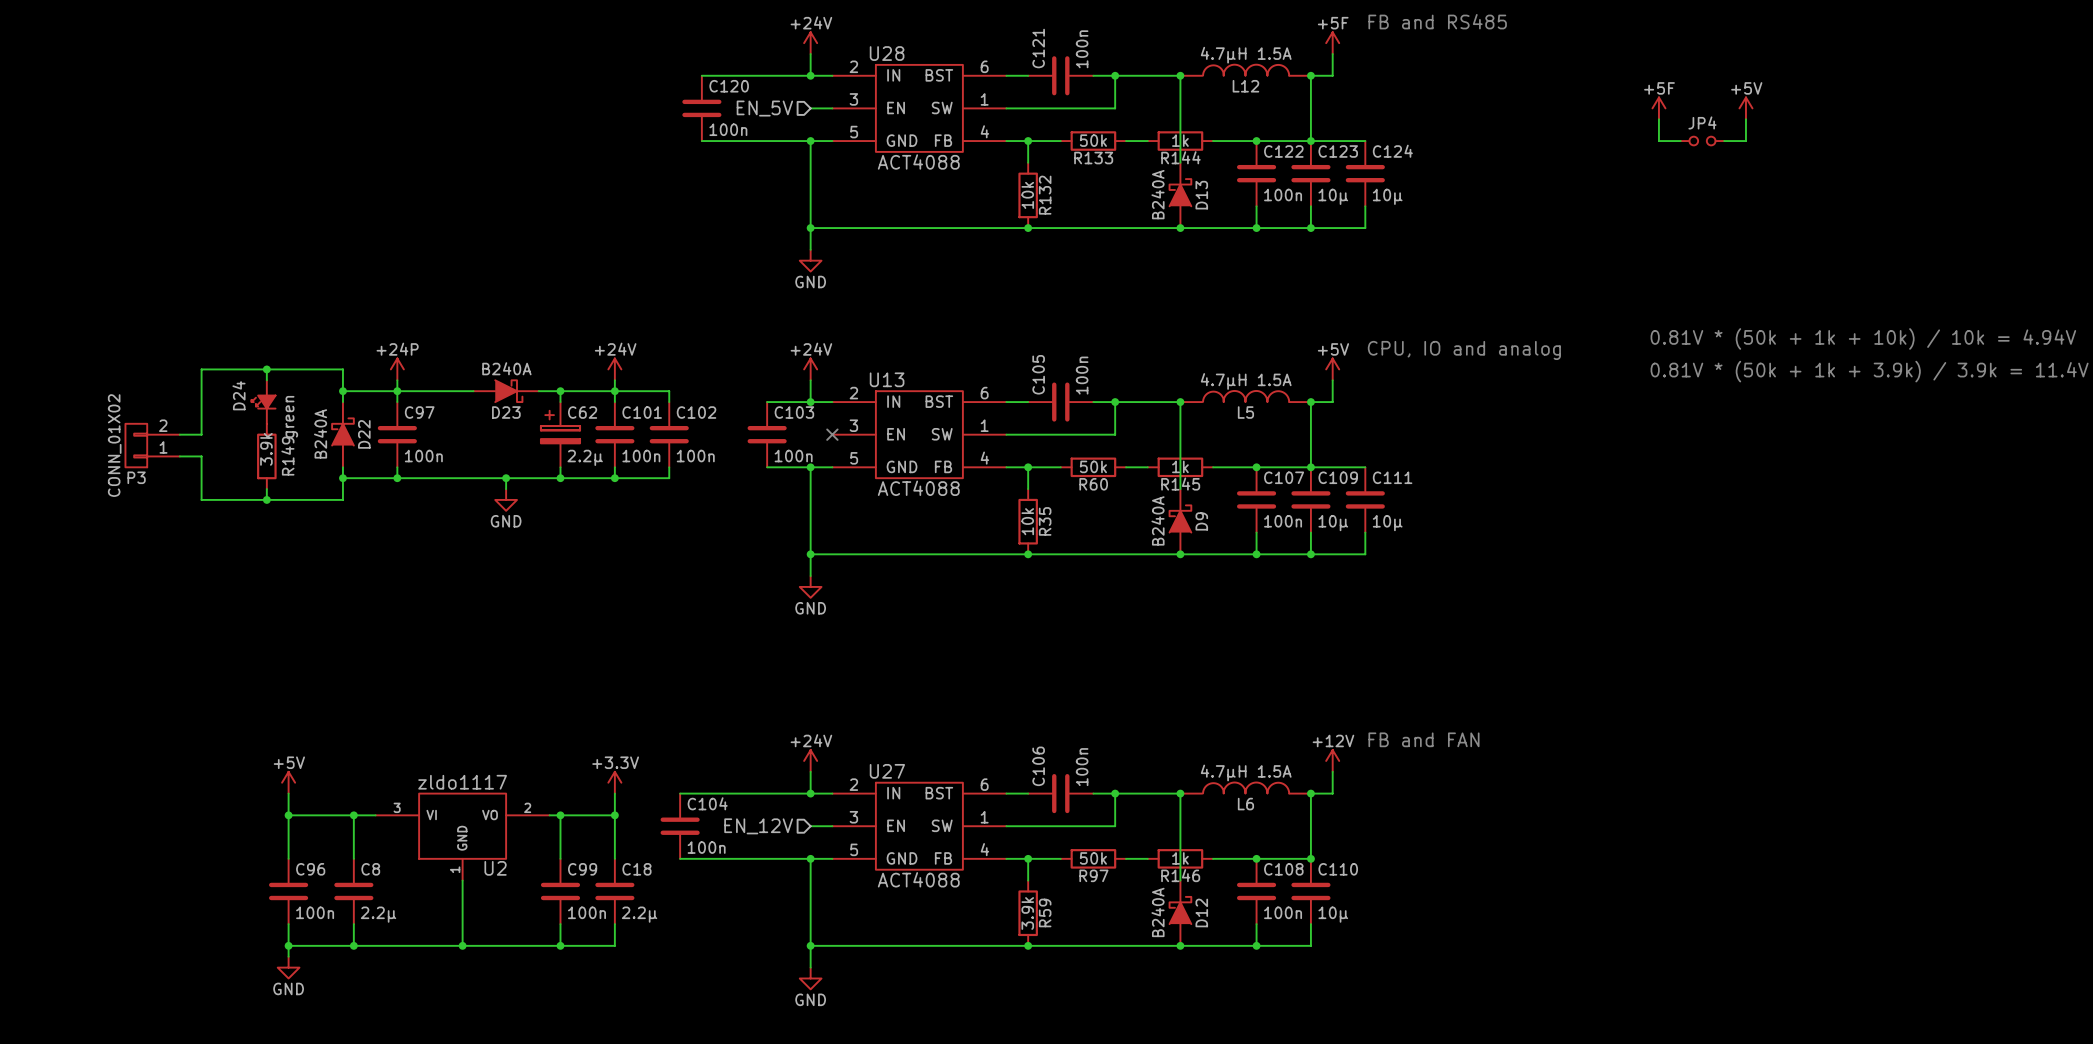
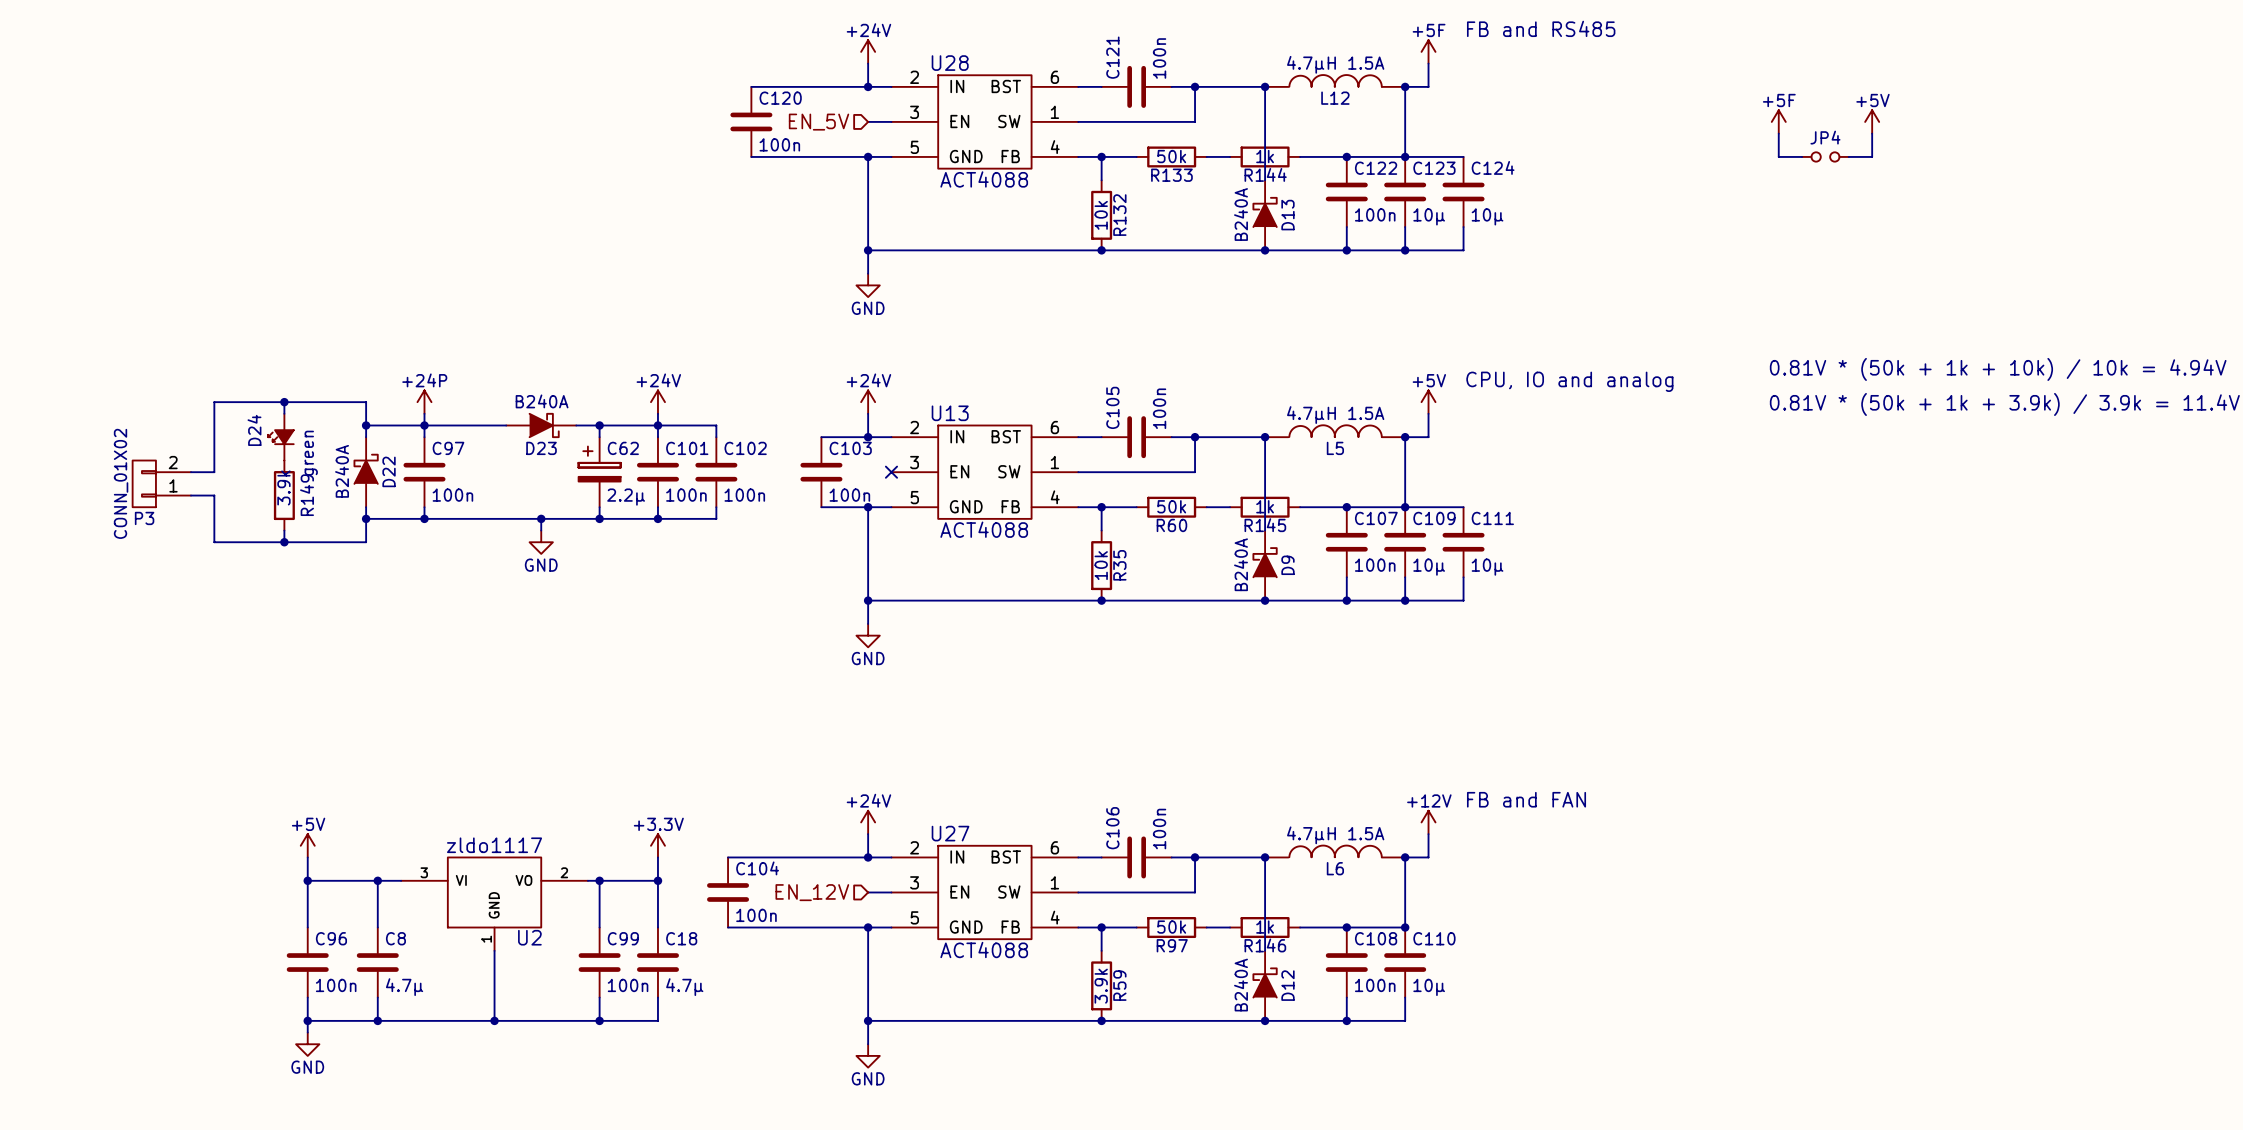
C8 value: 2.2µ (378, 914) -> 4.7µ (404, 987)
C18 value: 2.2µ (639, 914) -> 4.7µ (684, 987)

